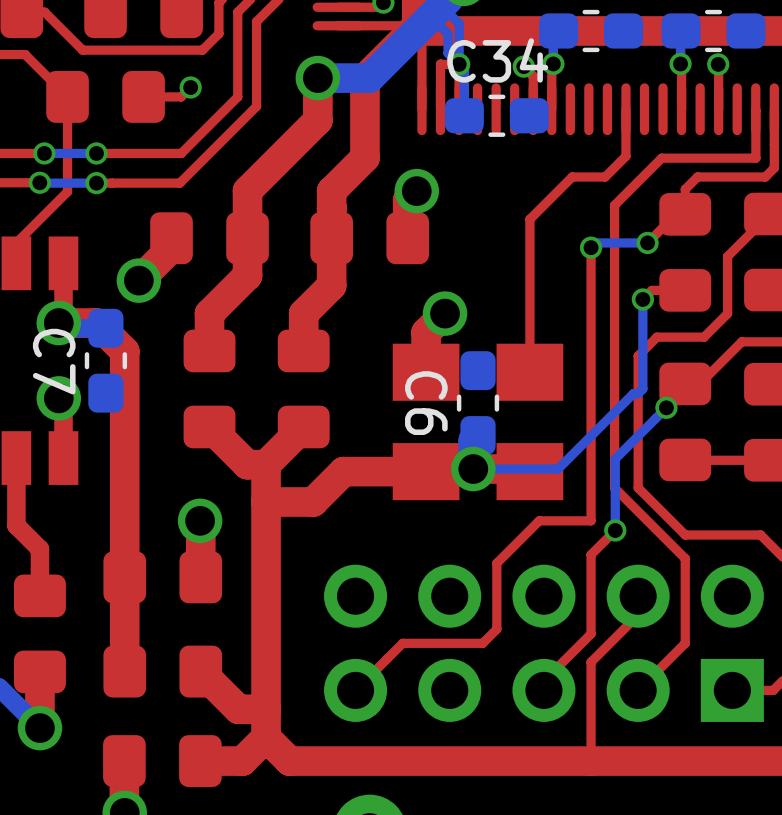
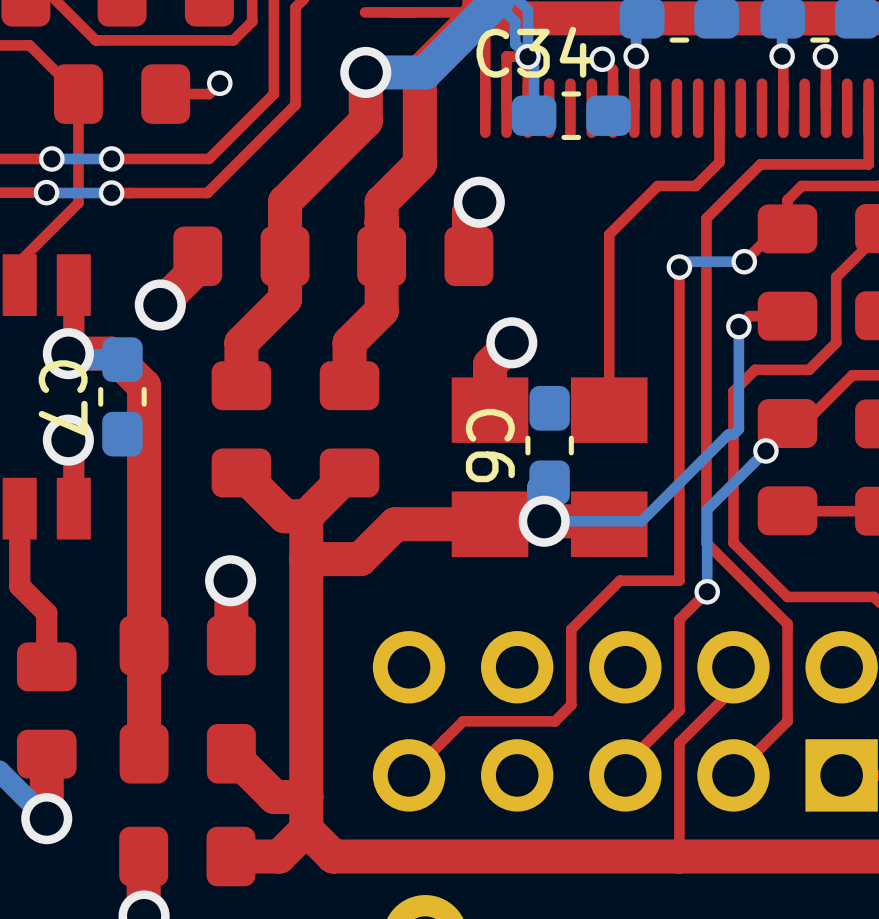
C34 name position: C34 (497, 60) -> C34 (534, 52)

